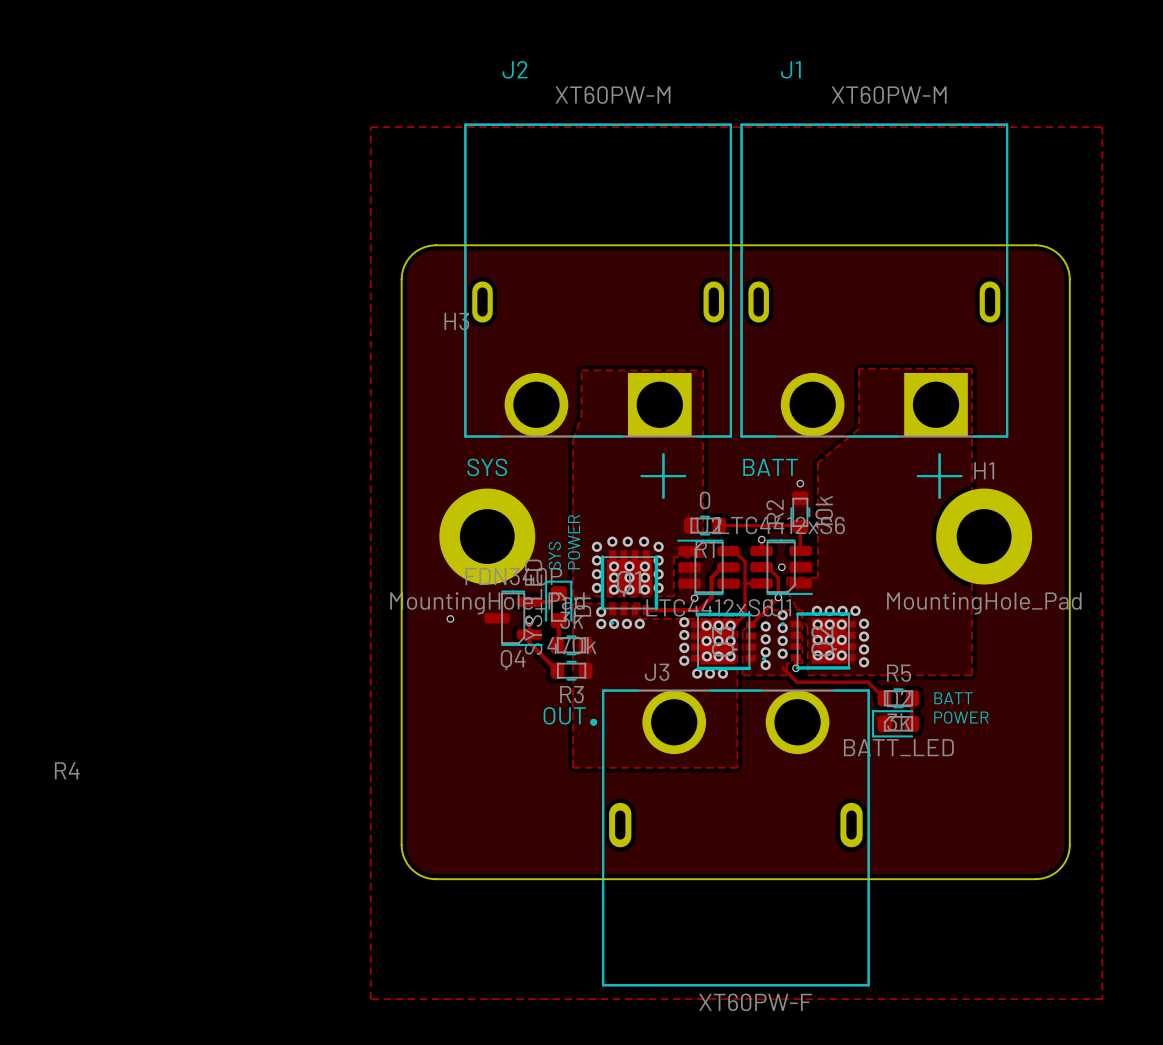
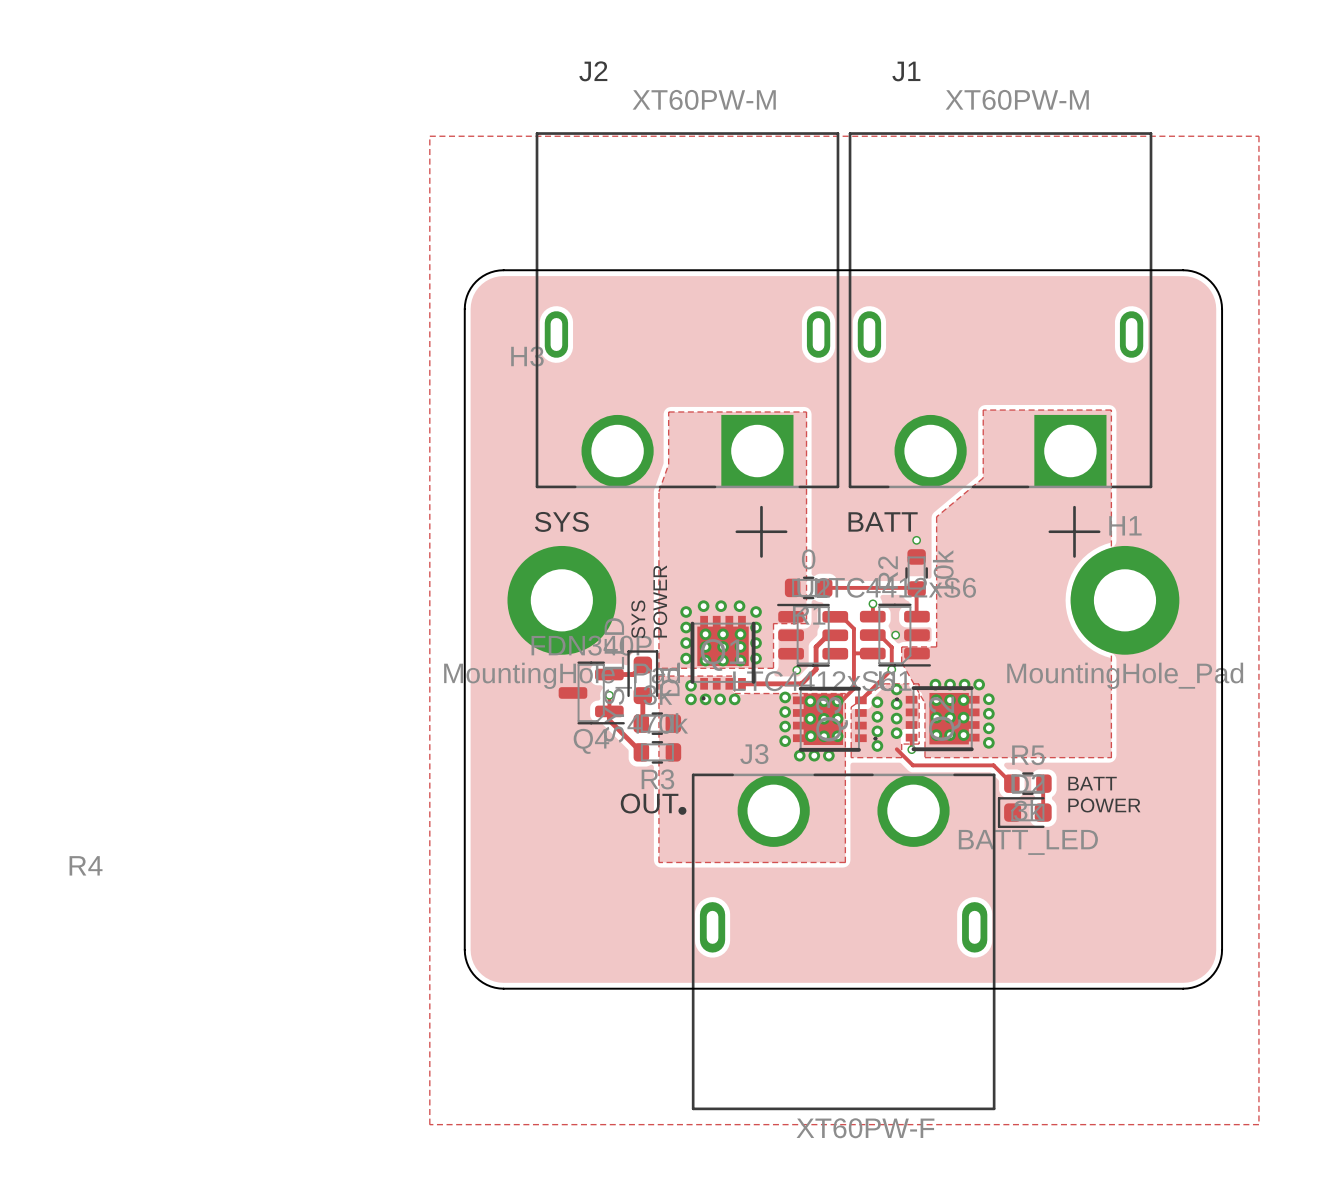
via: (450, 618) -> none

